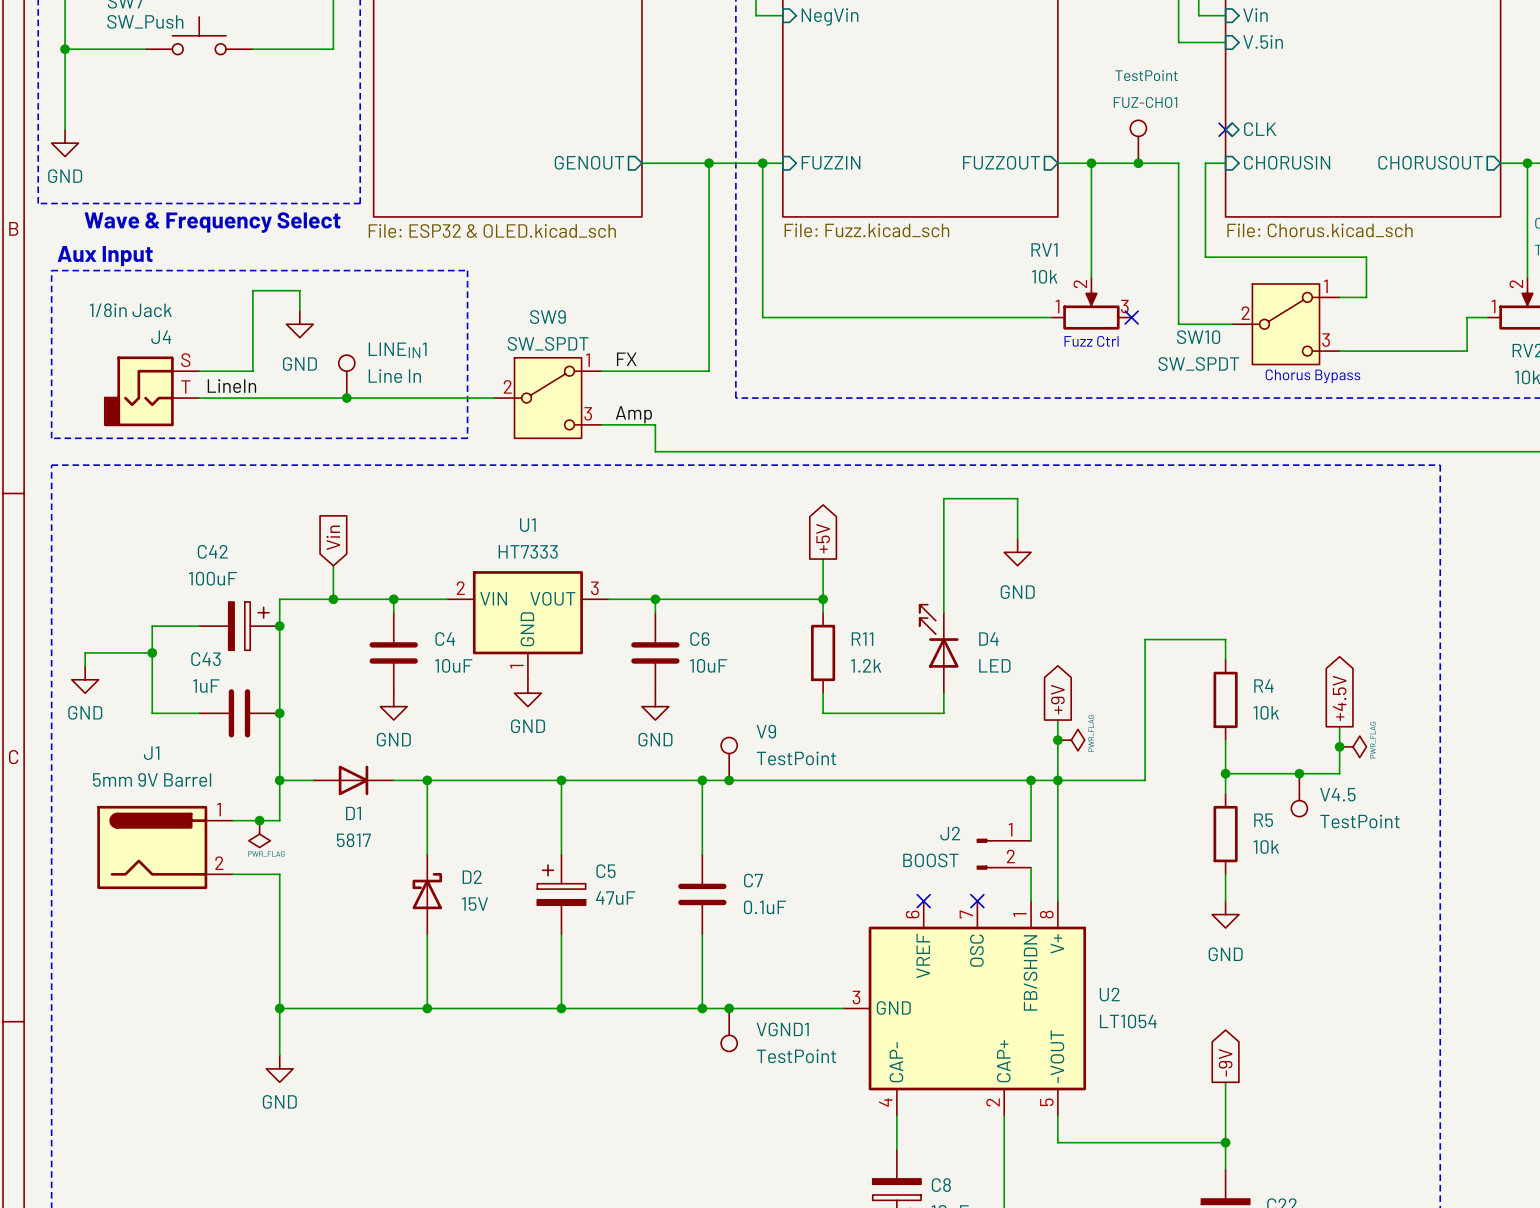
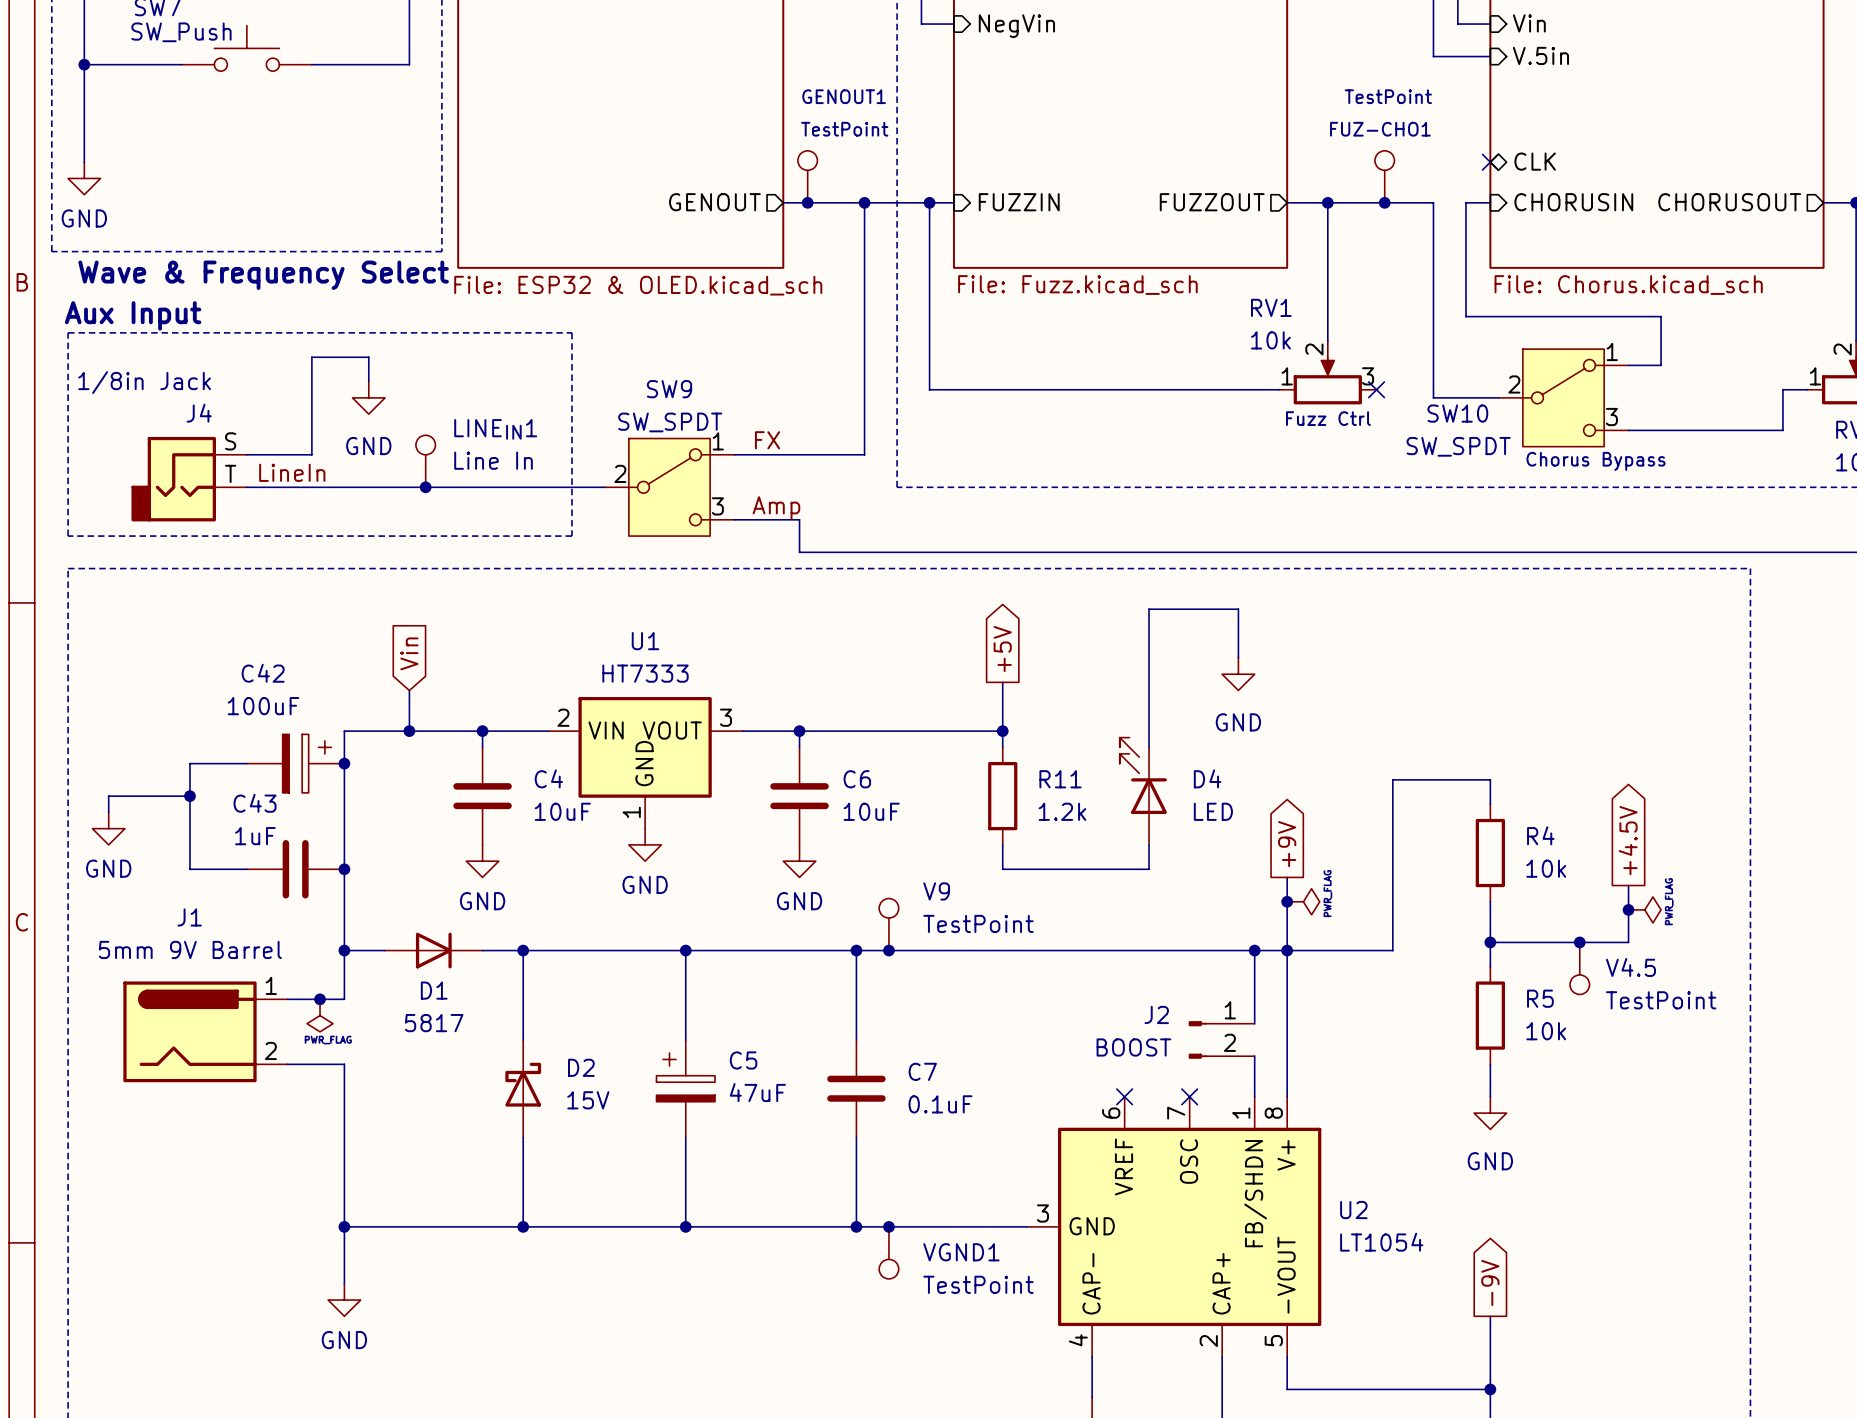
GENOUT1: none -> TestPoint (807, 176)
junction: none -> (807, 202)

